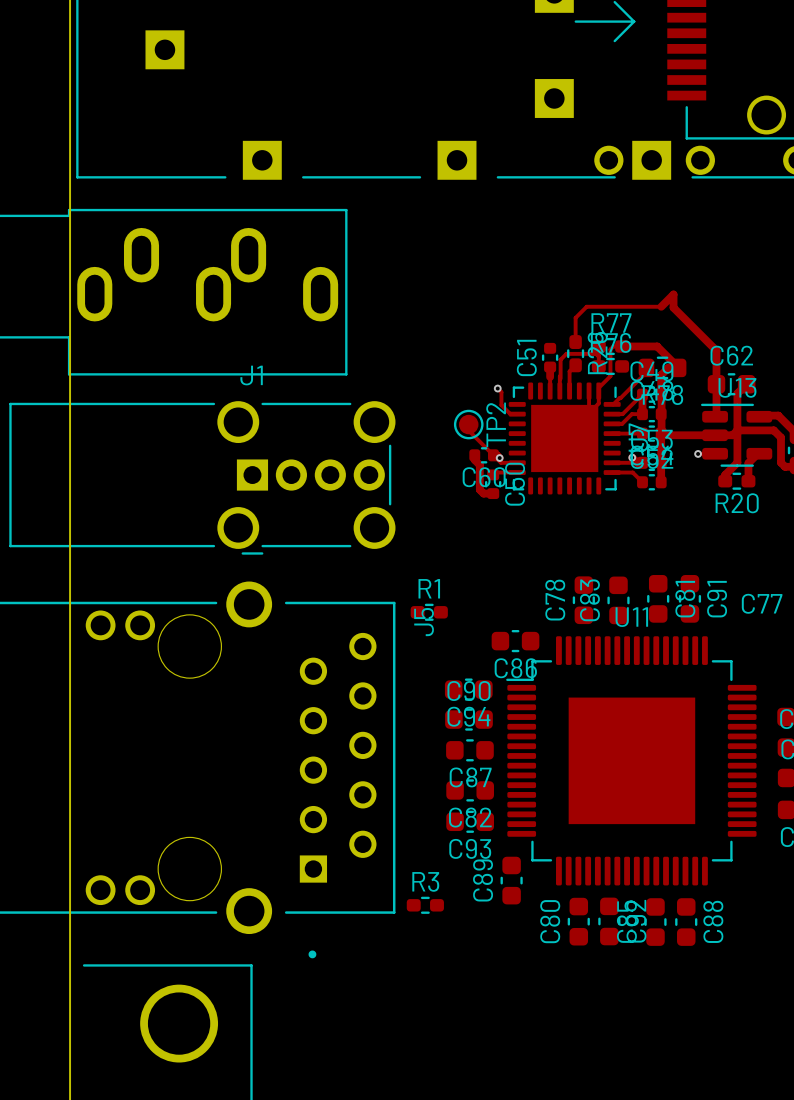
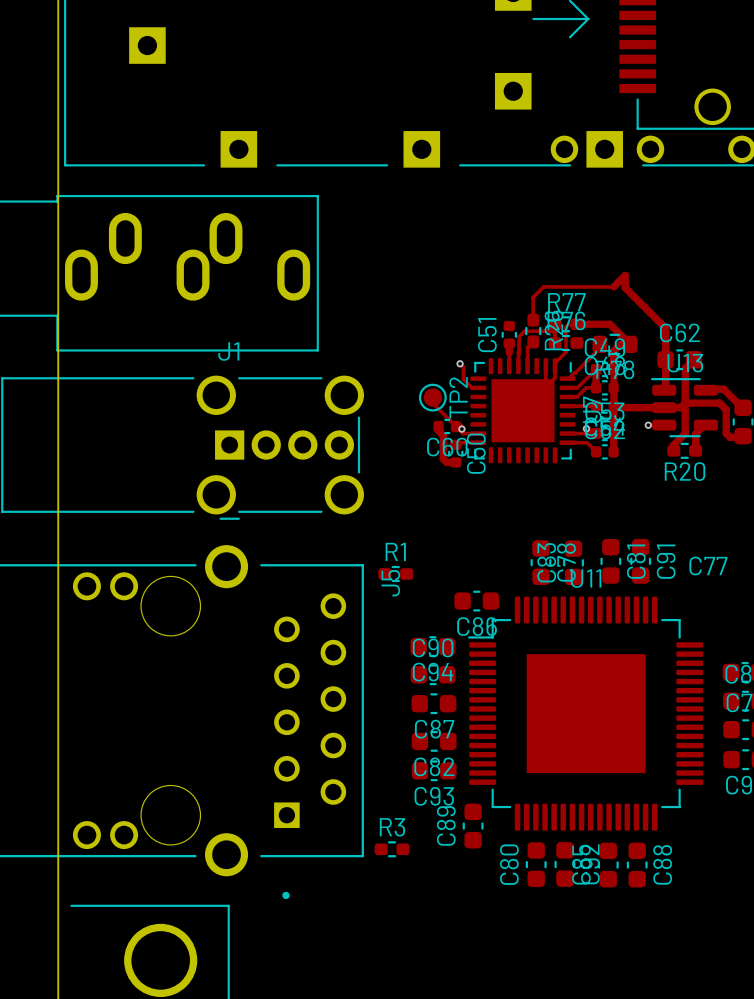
C78 name position: C78 (555, 600) -> C78 (566, 562)

